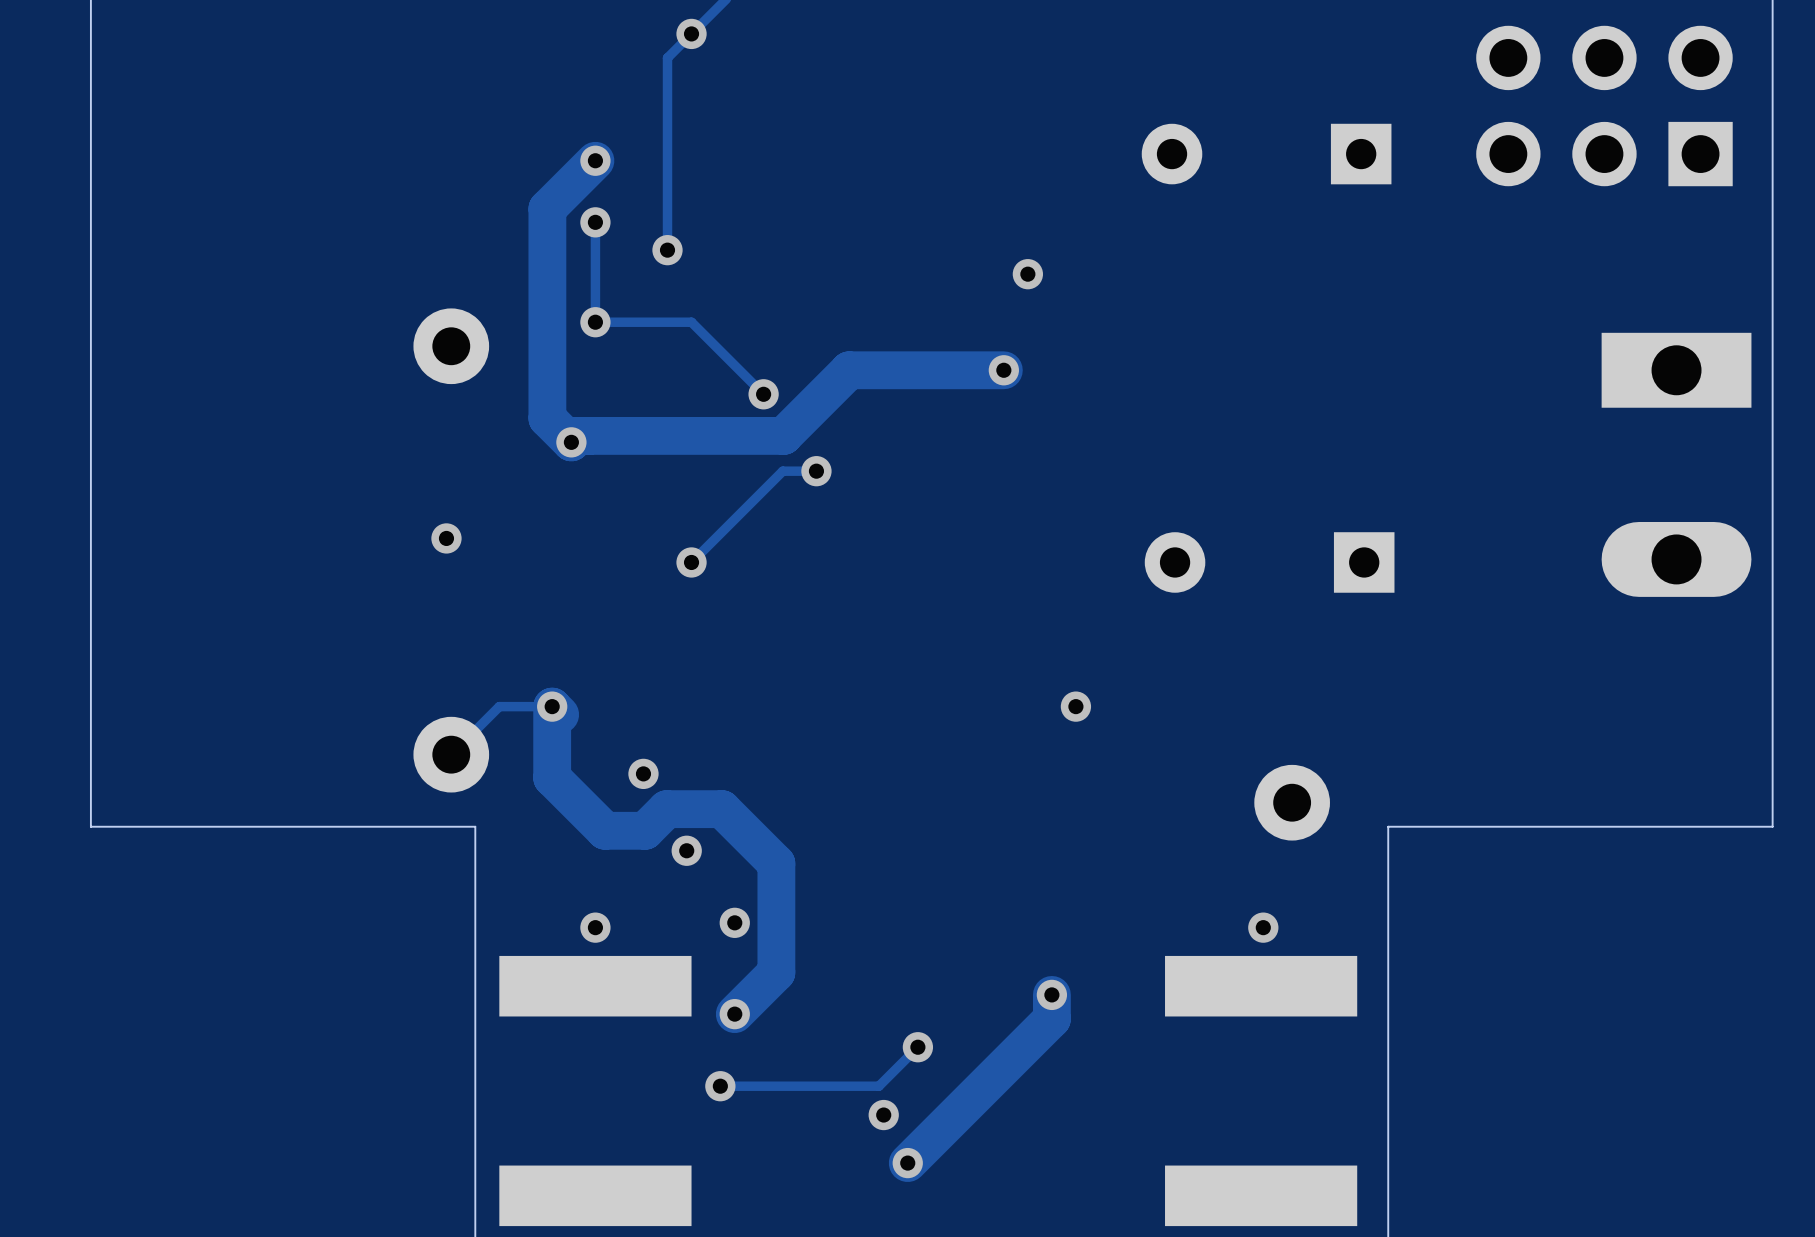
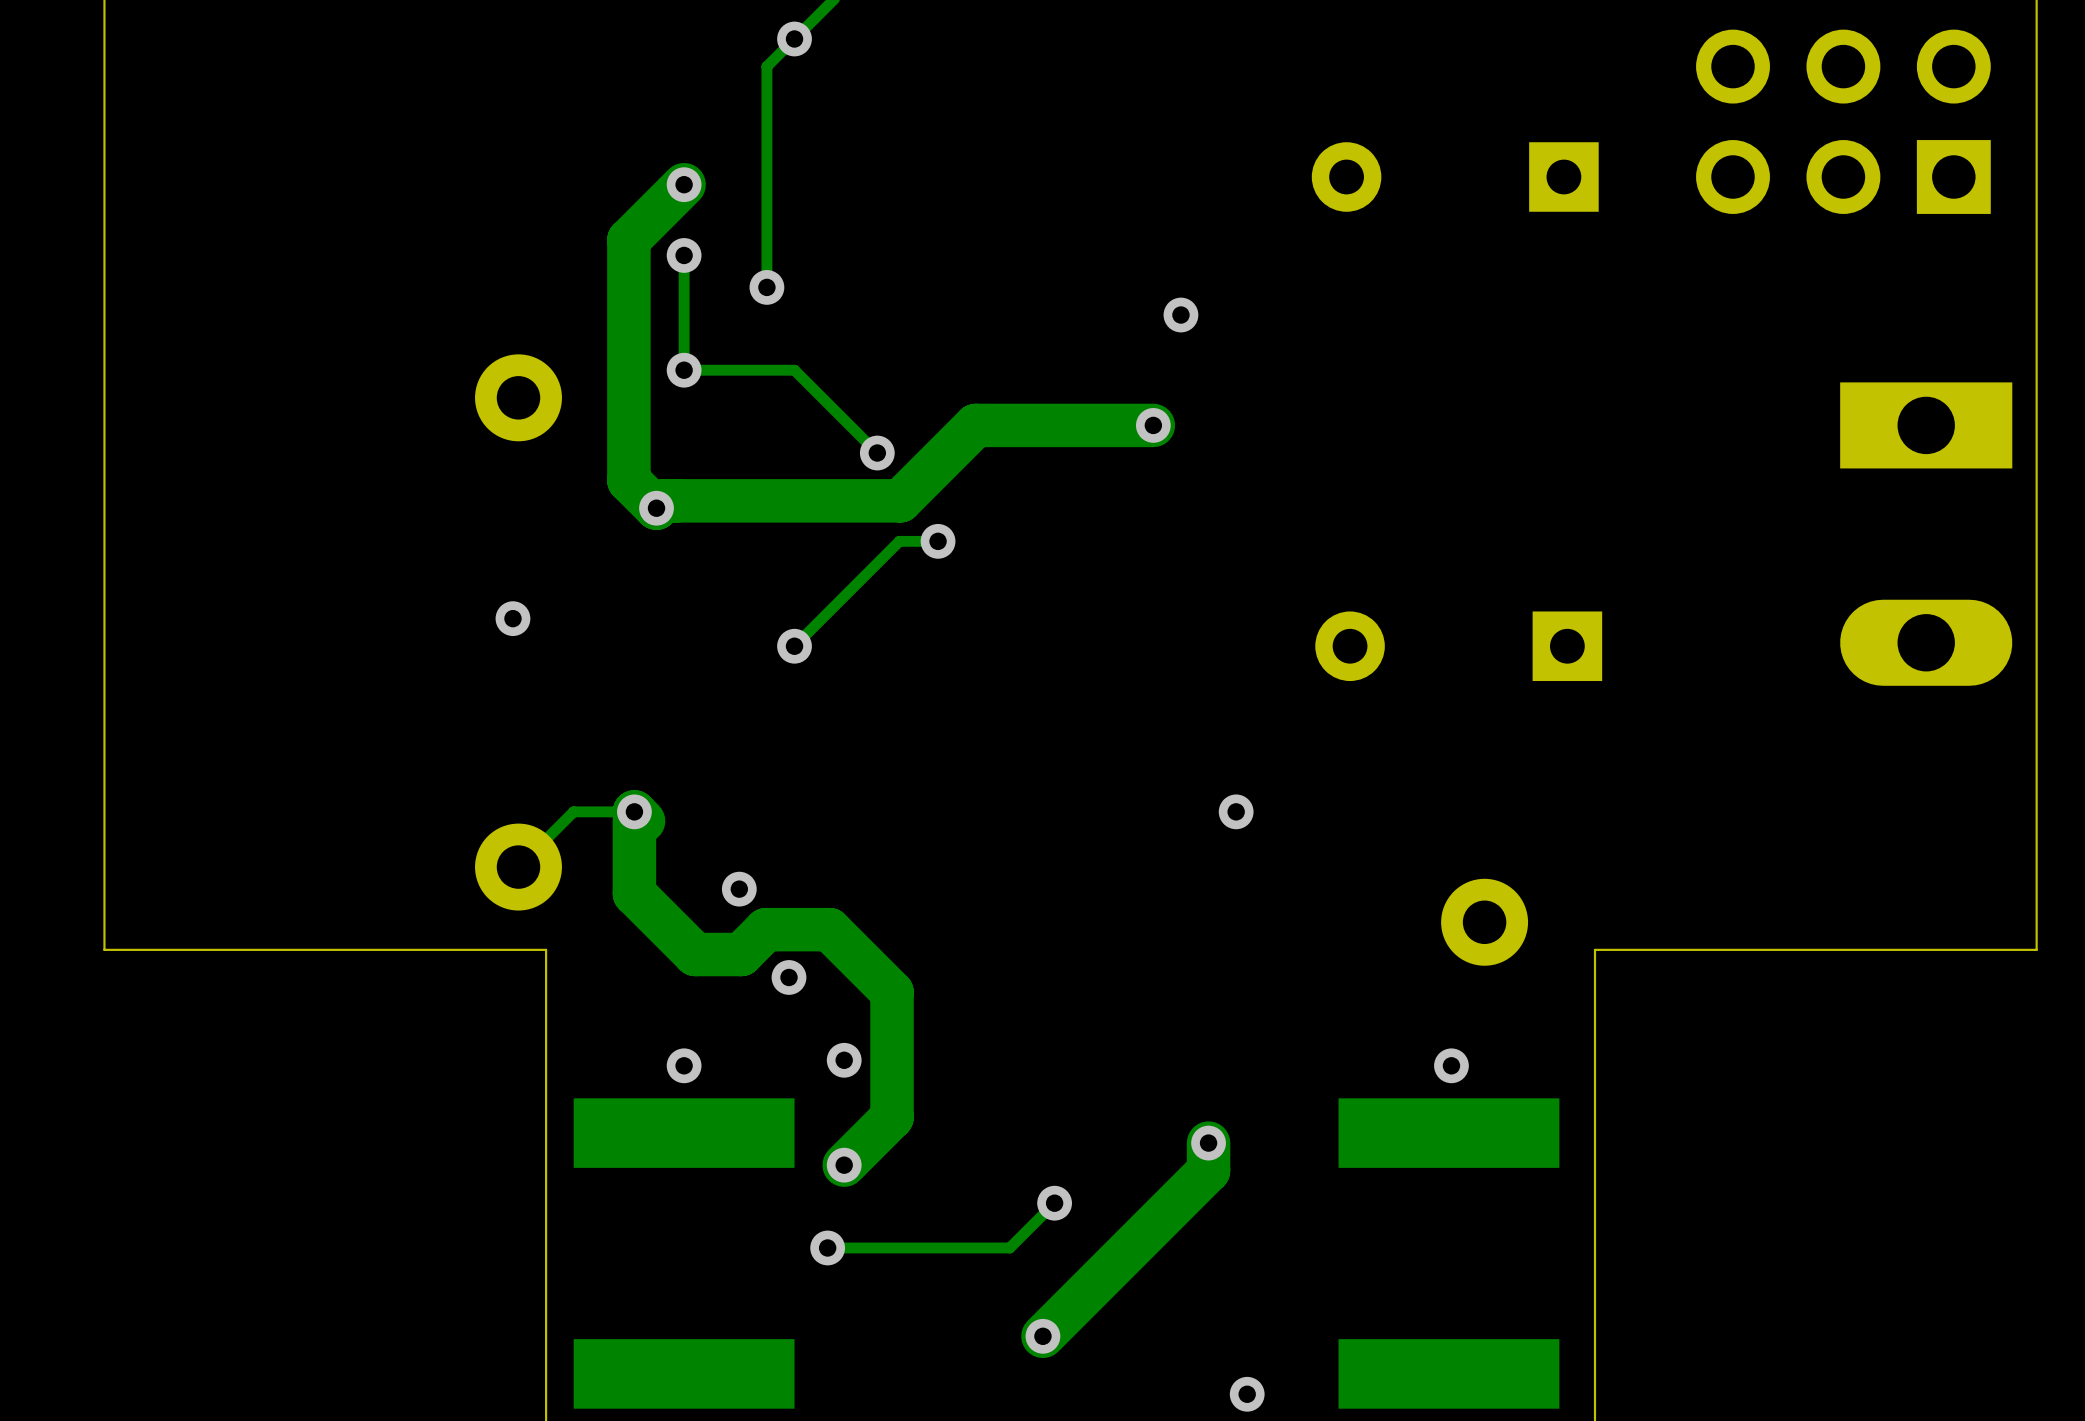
via: (883, 1115) -> none
via: none -> (1247, 1394)

